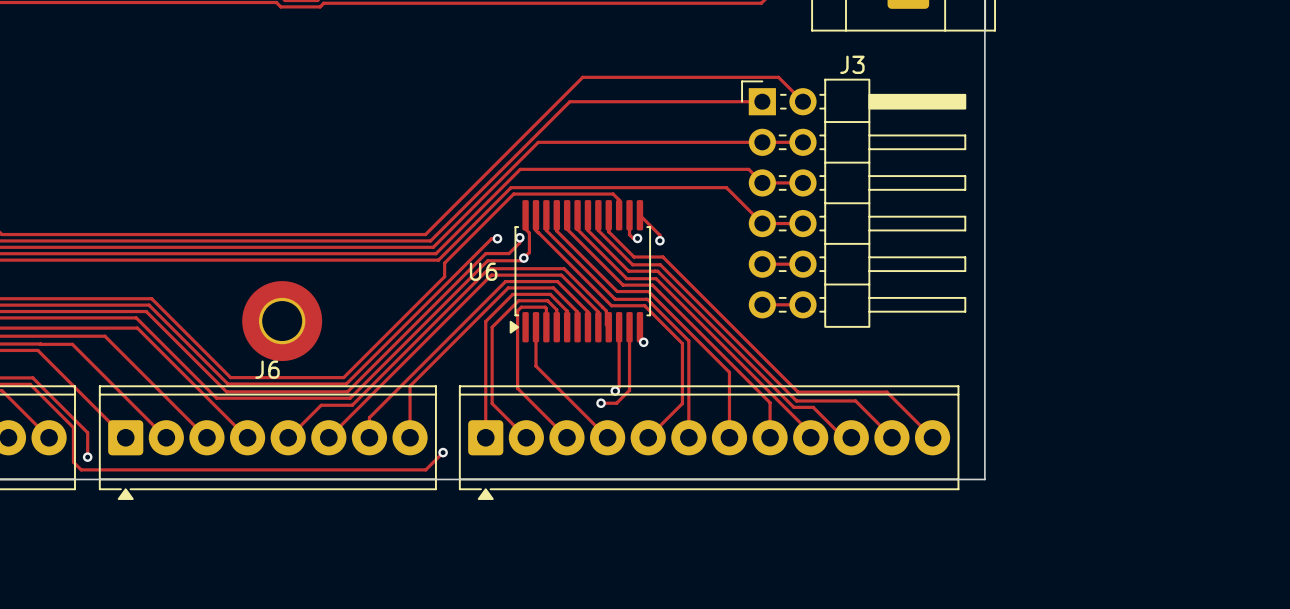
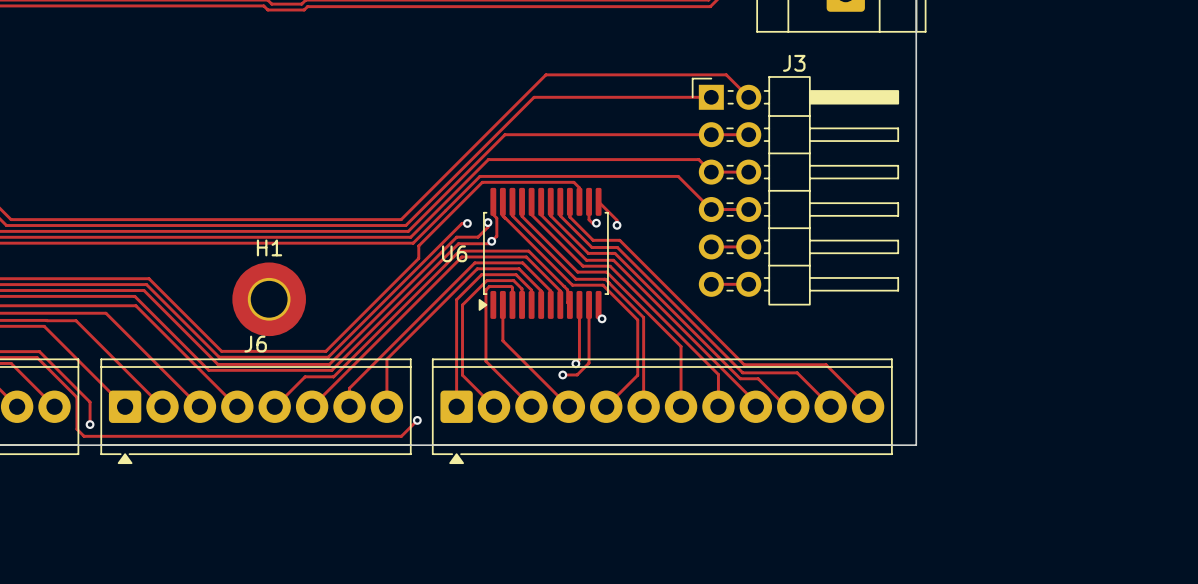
H1 name: none -> H1 (269, 247)

